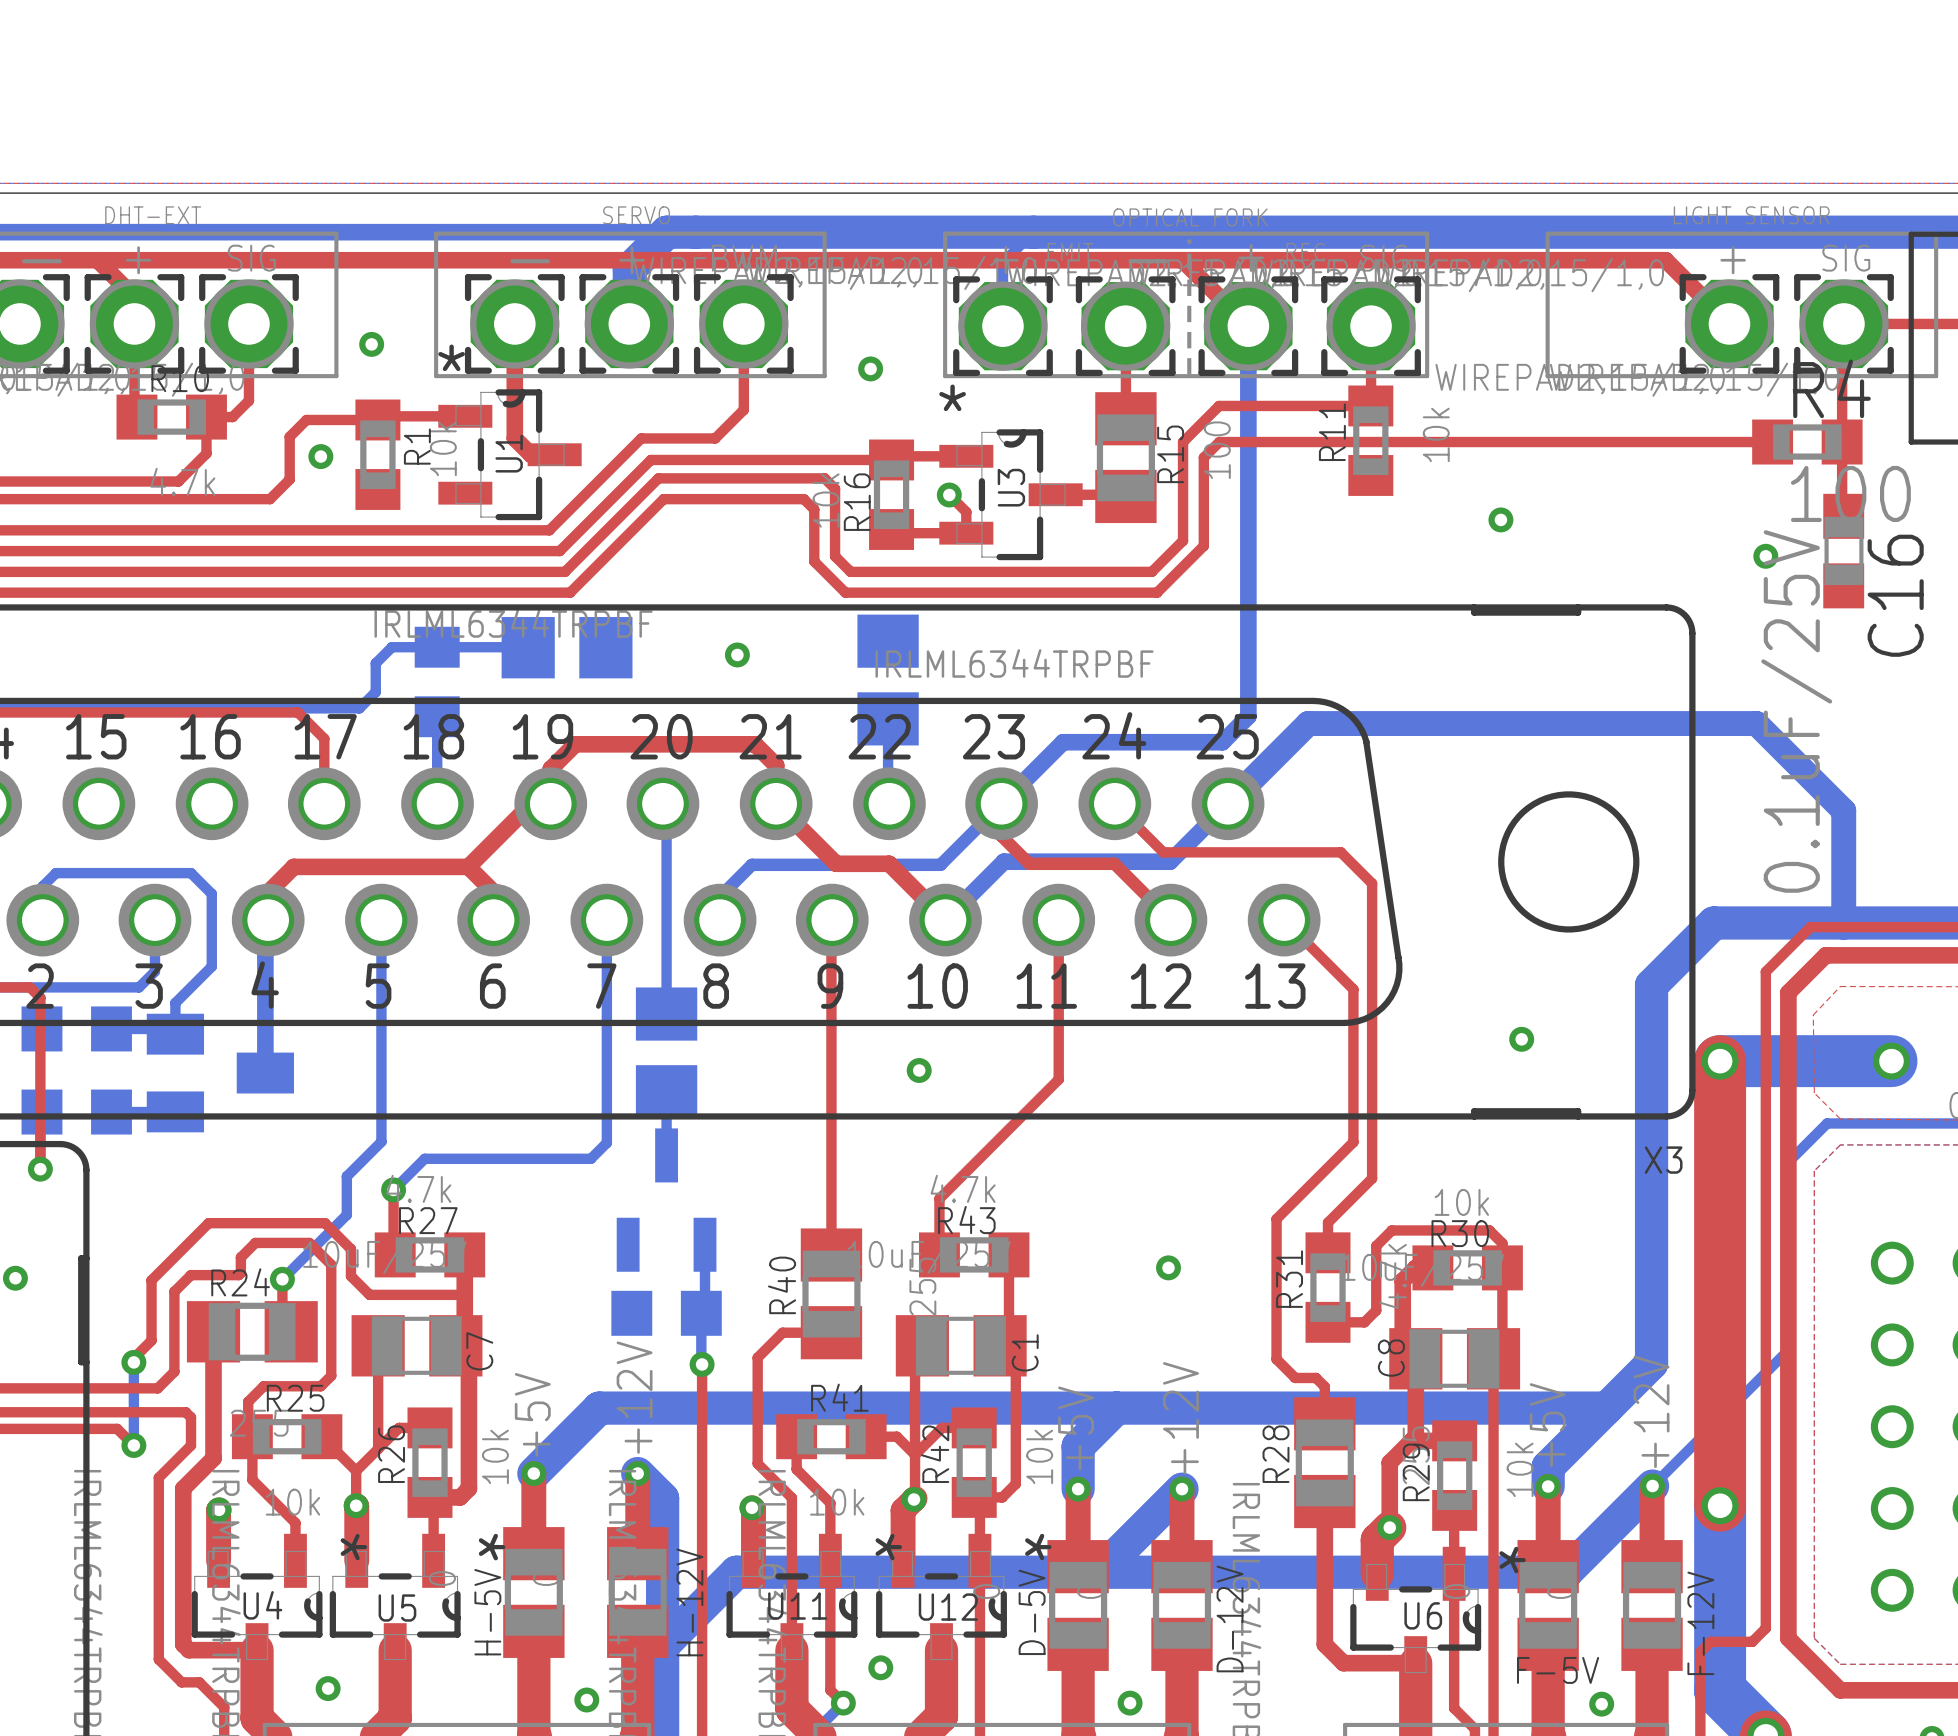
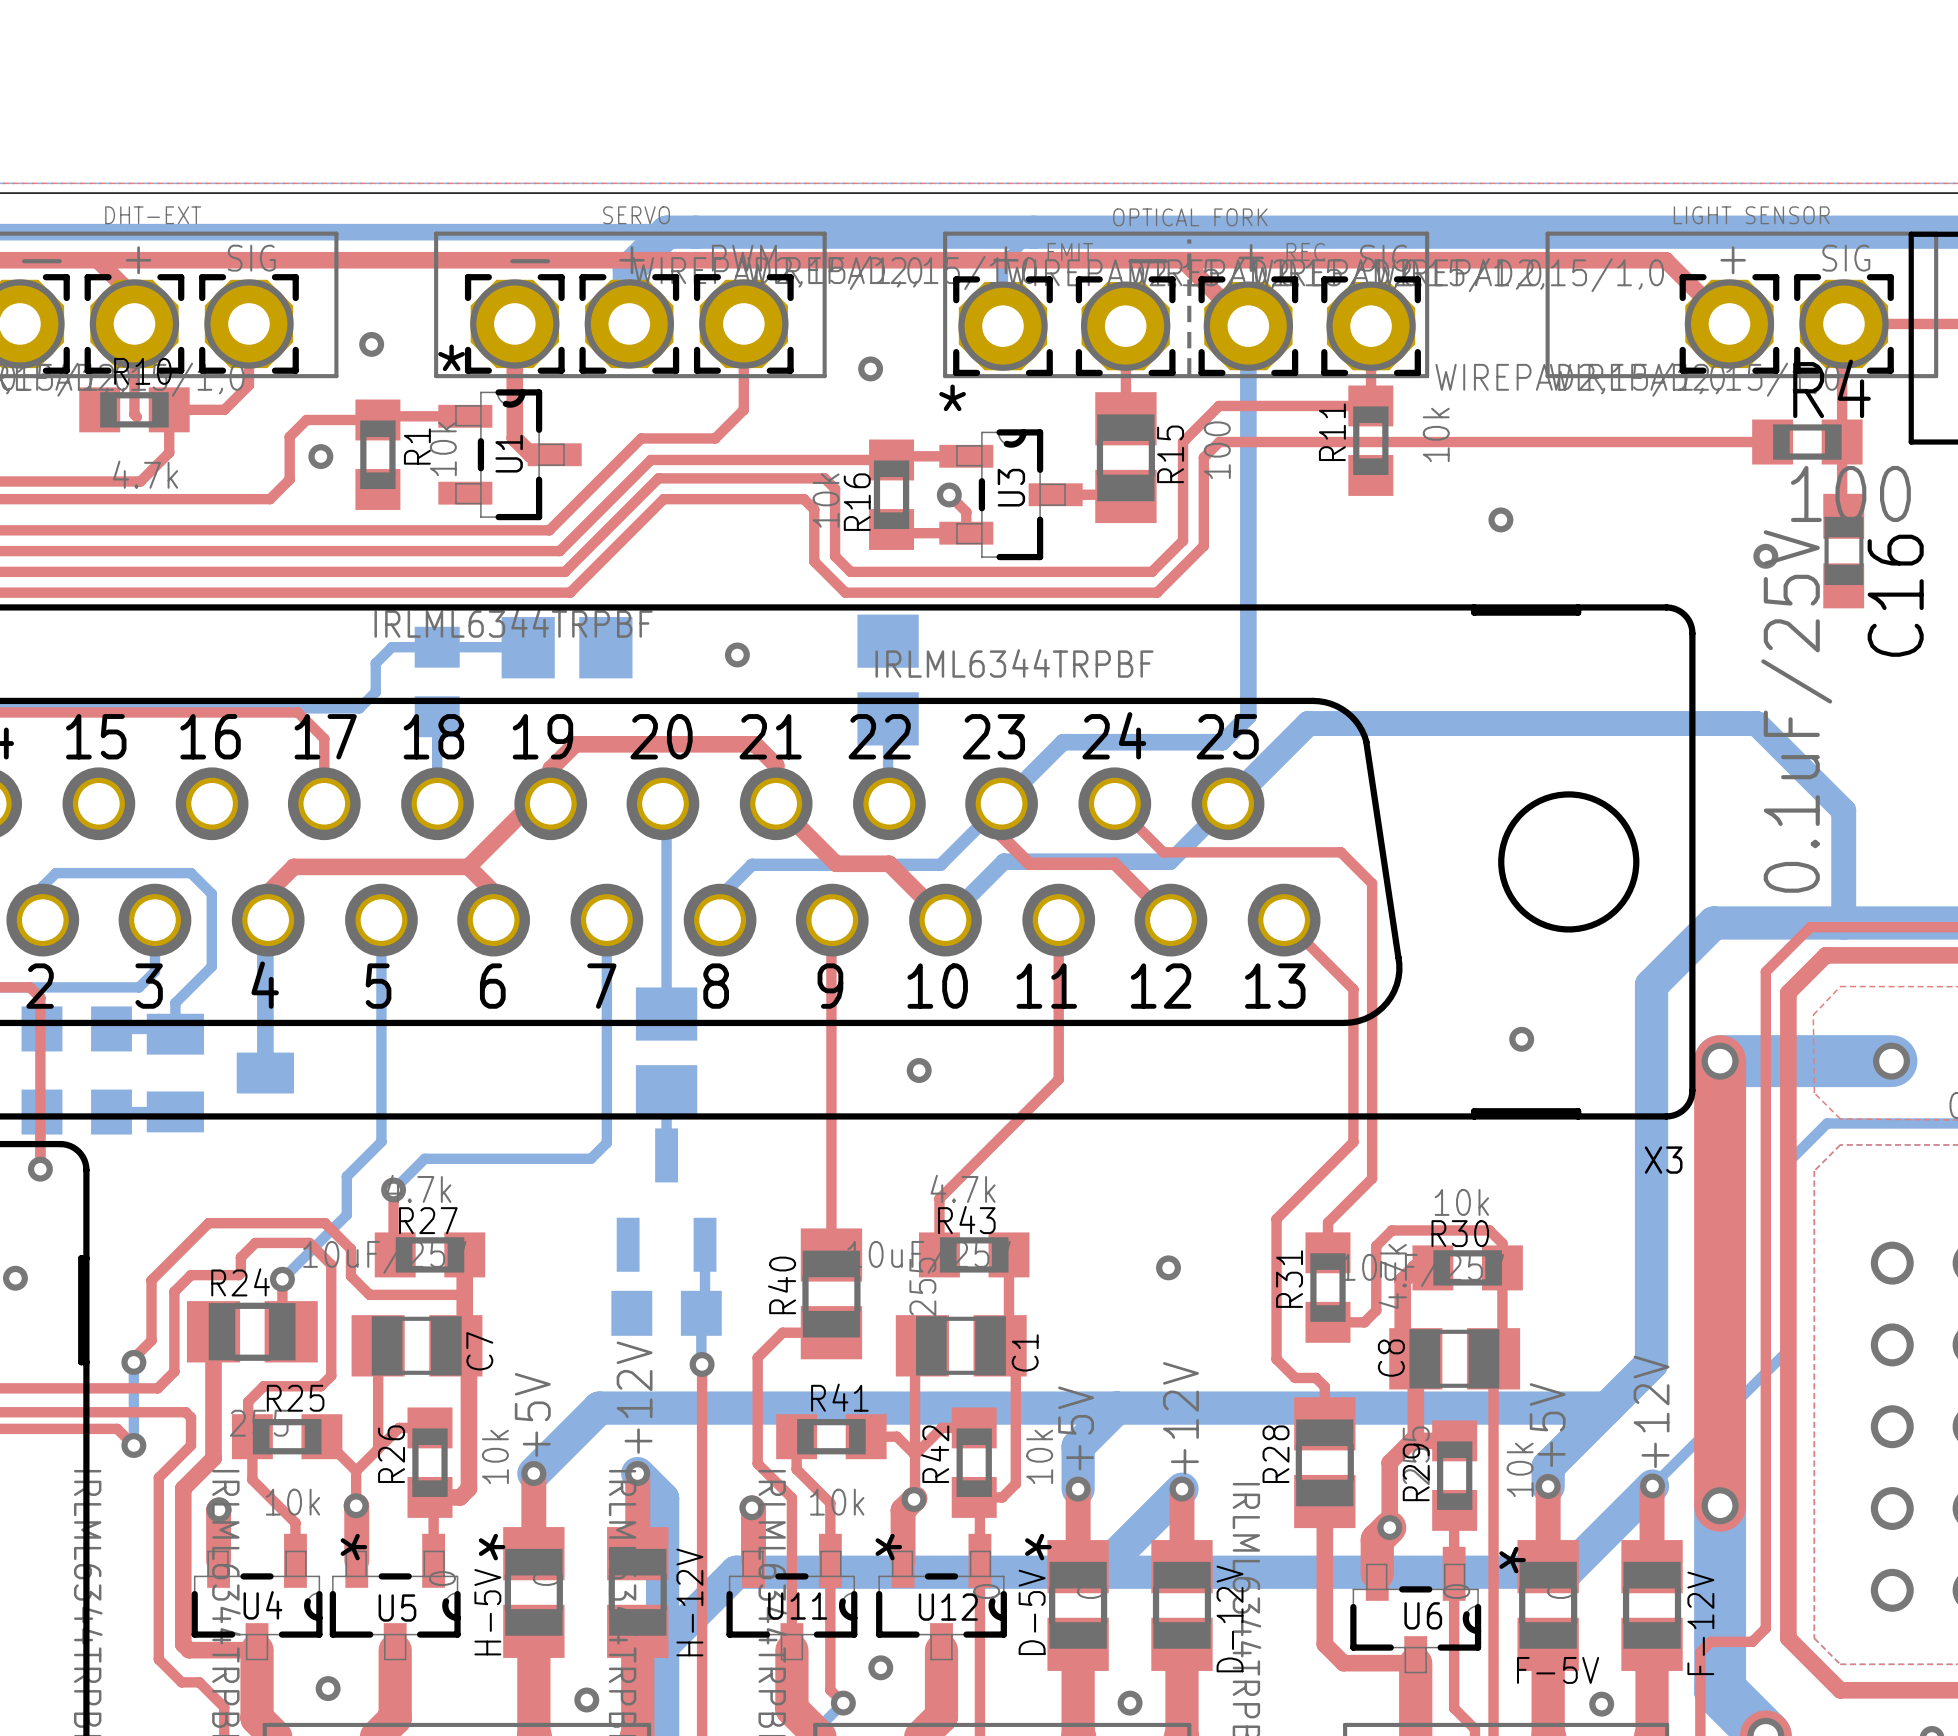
top track: (248, 385) (248, 400) (232, 417) (206, 417) (206, 453) (178, 481) (140, 481) -> (248, 385) (224, 409) (169, 409) (169, 452) (140, 481)
R10 position: (171, 417) -> (134, 409)

